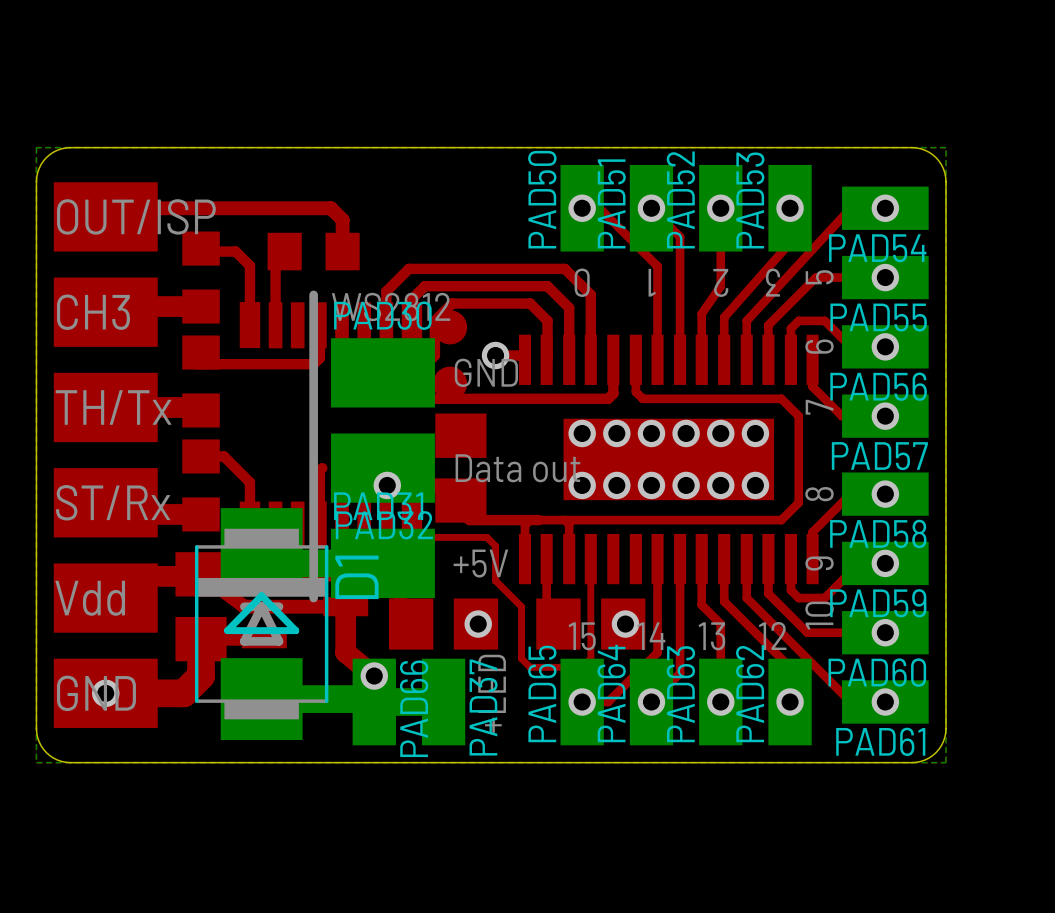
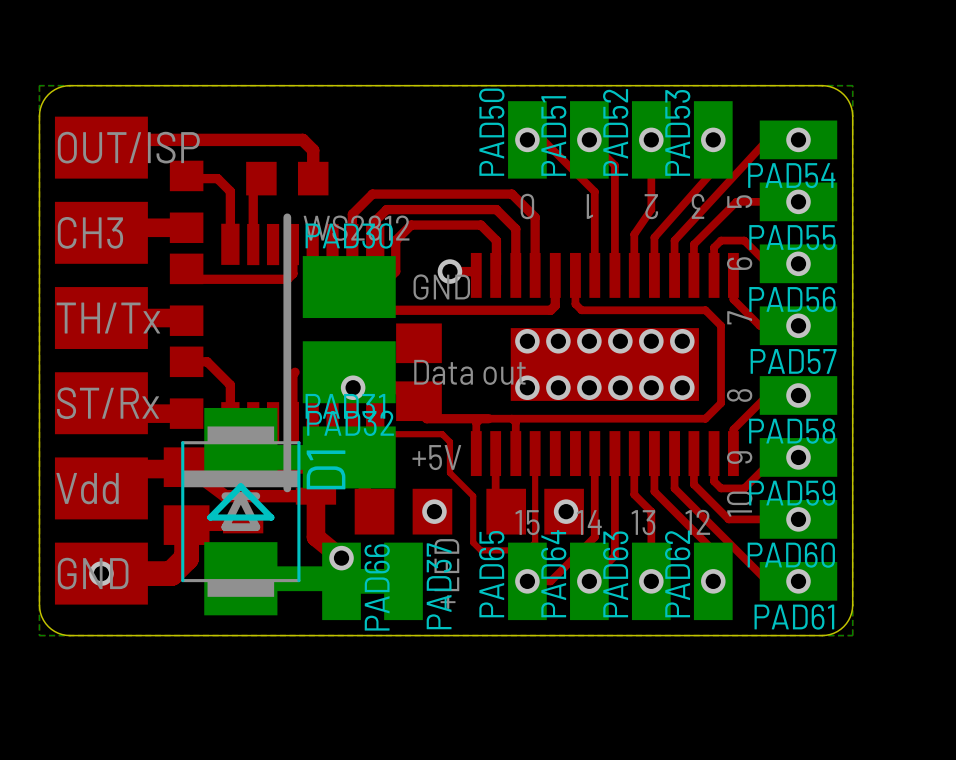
part: (450, 327) -> none
part: (450, 383) -> none

